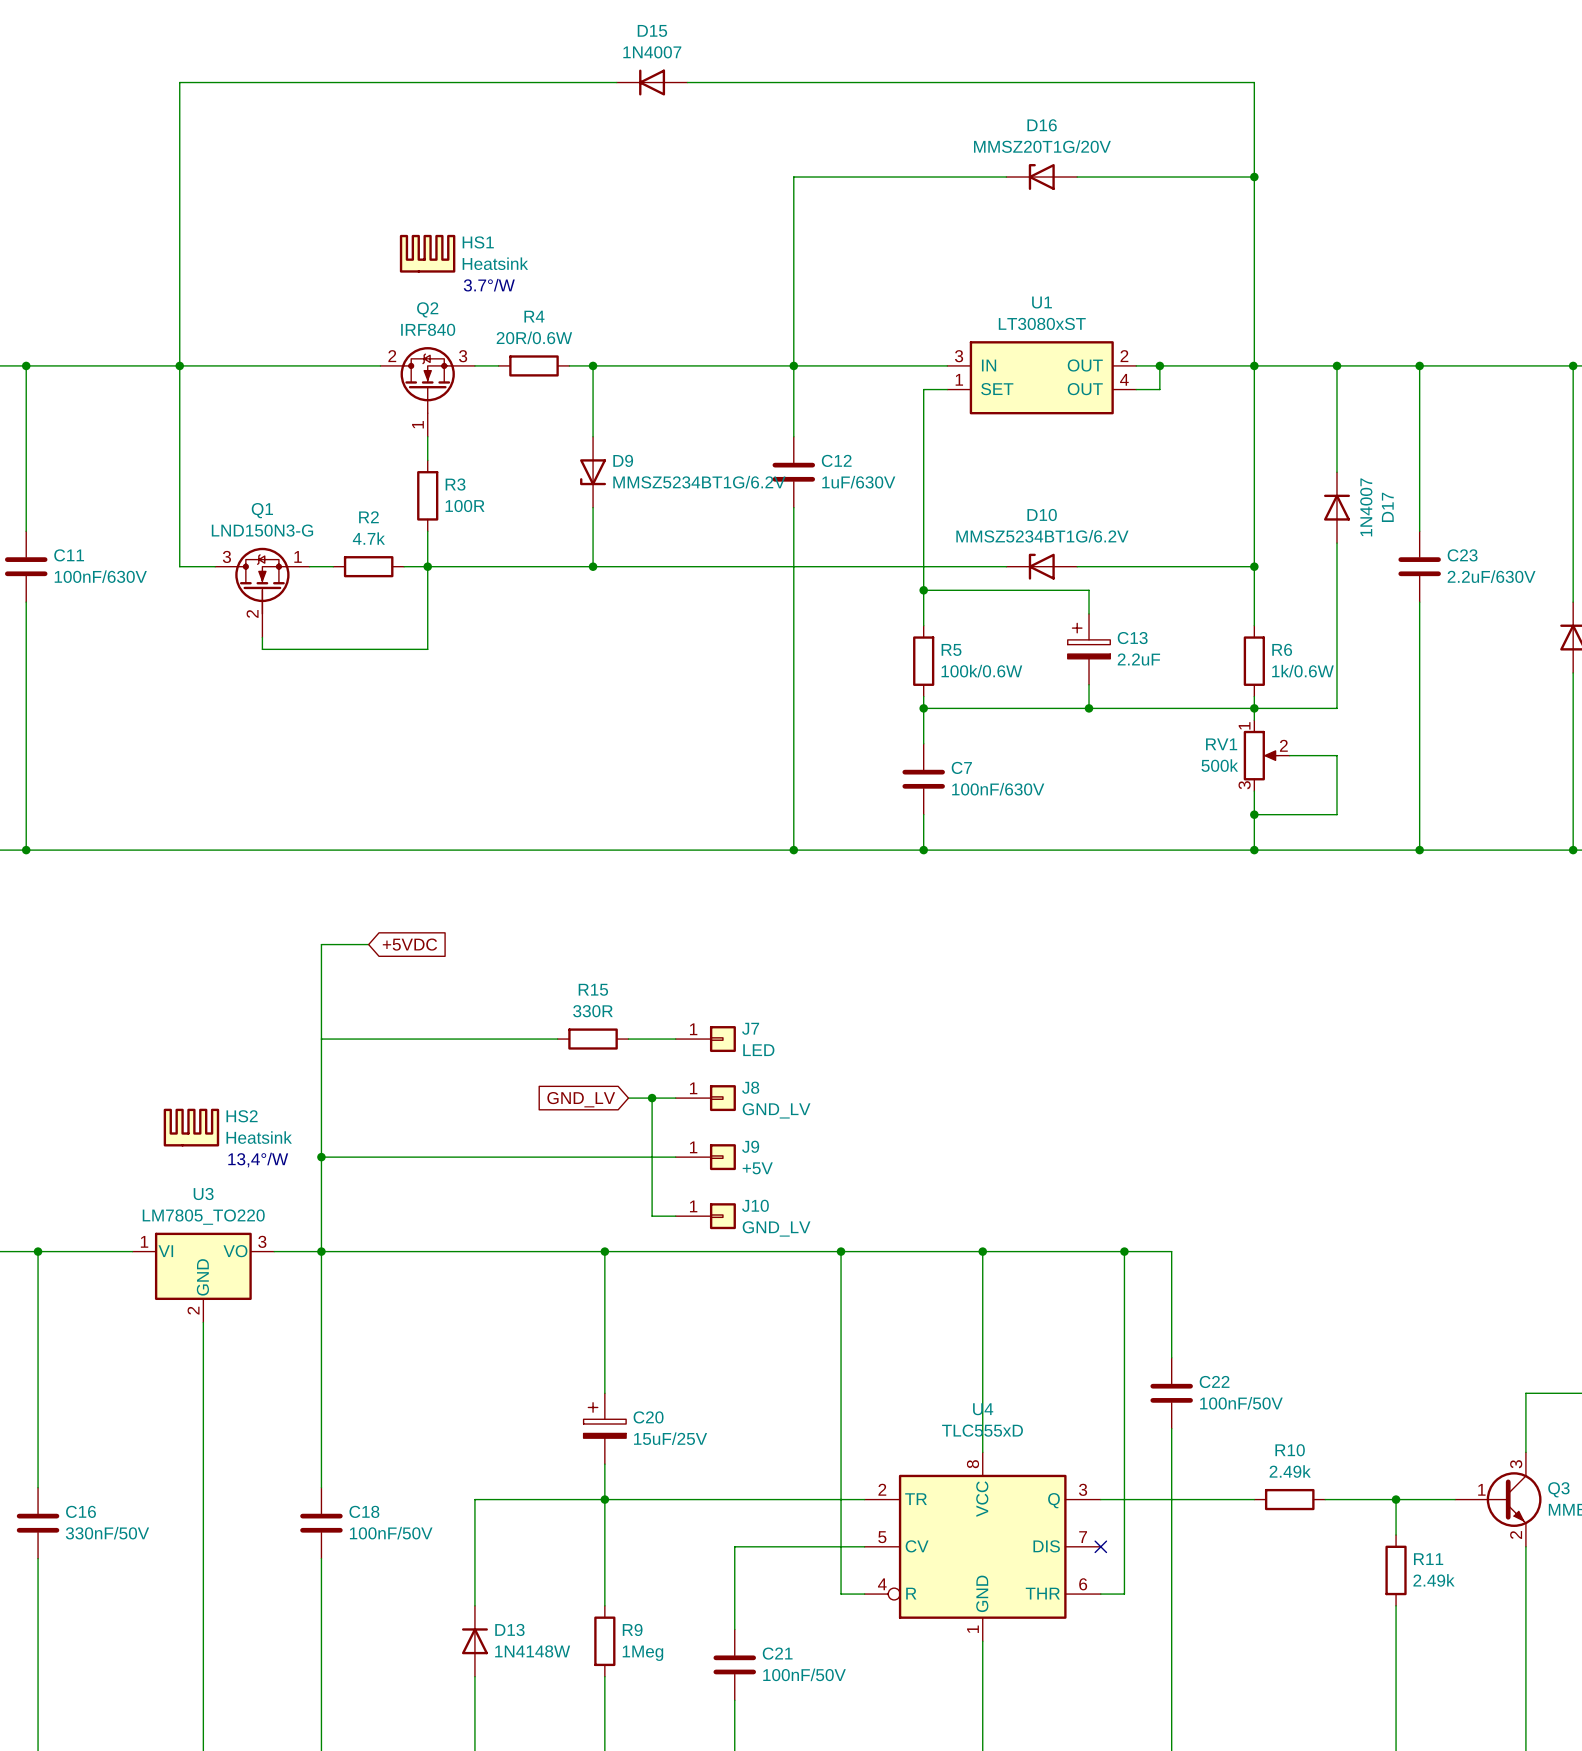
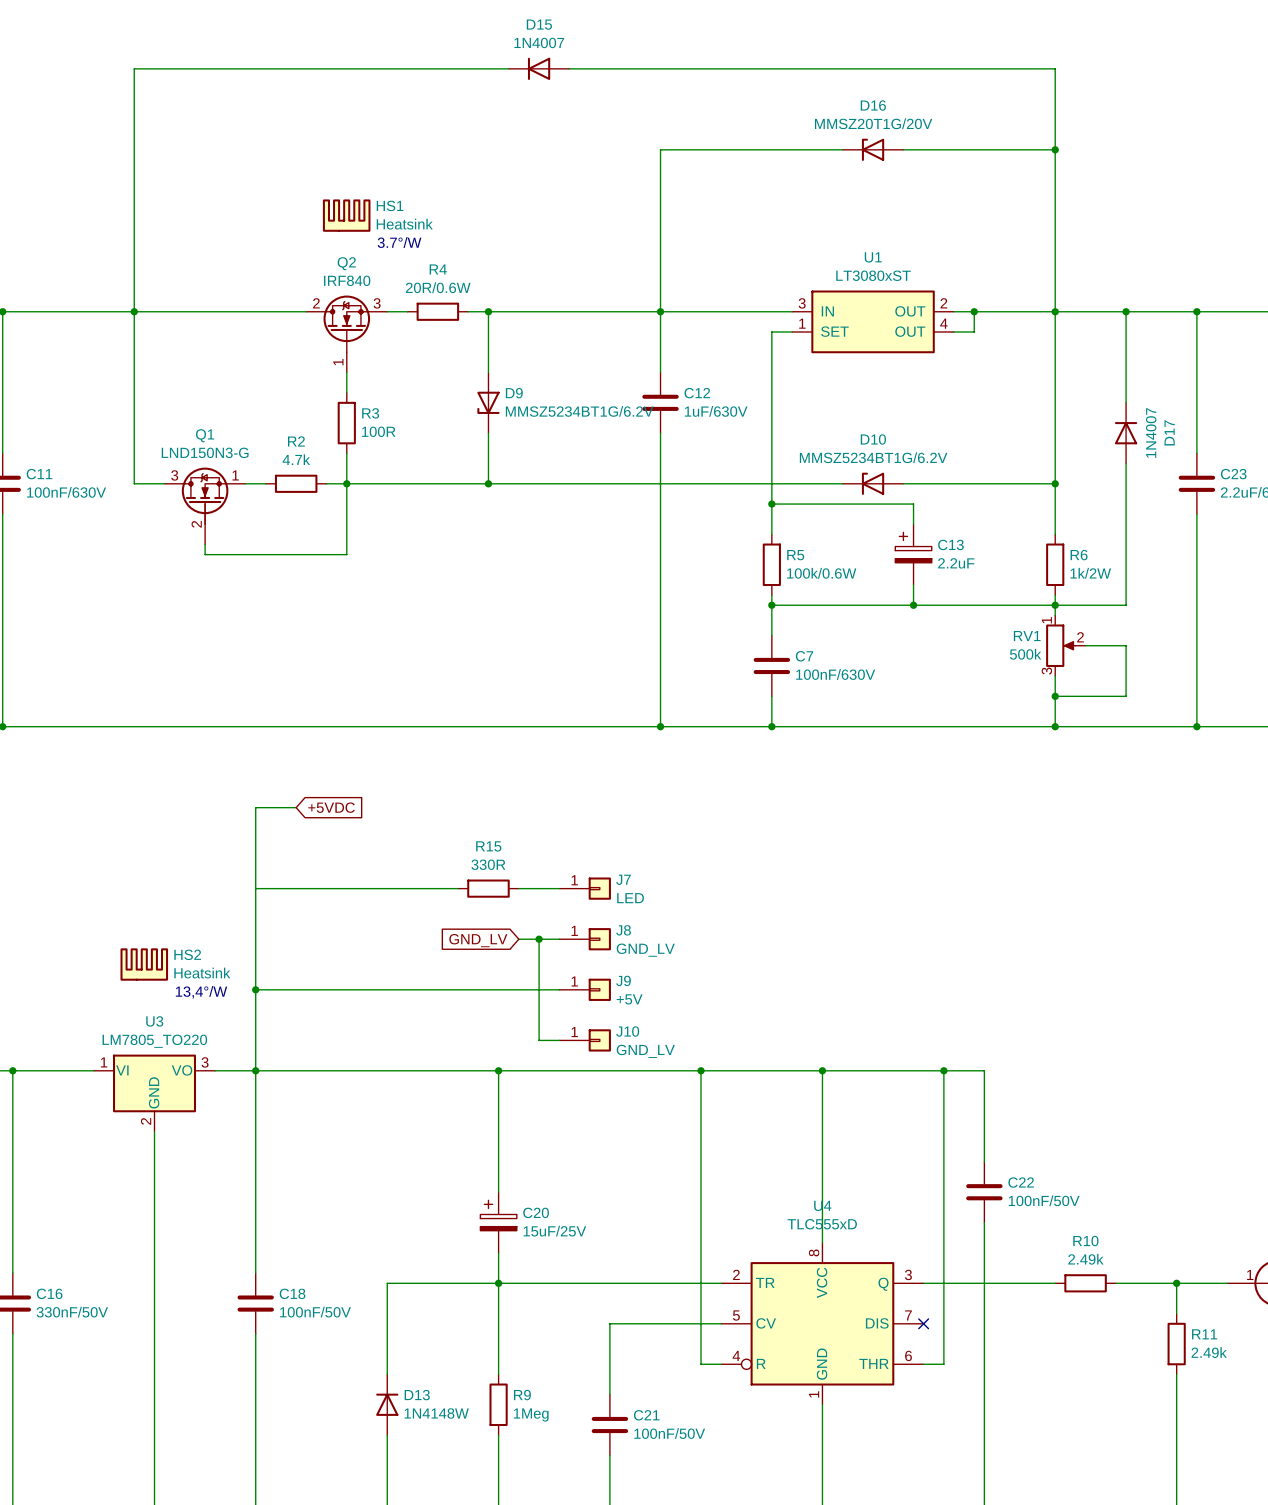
R6 value: 1k/0.6W (1302, 671) -> 1k/2W (1090, 573)

